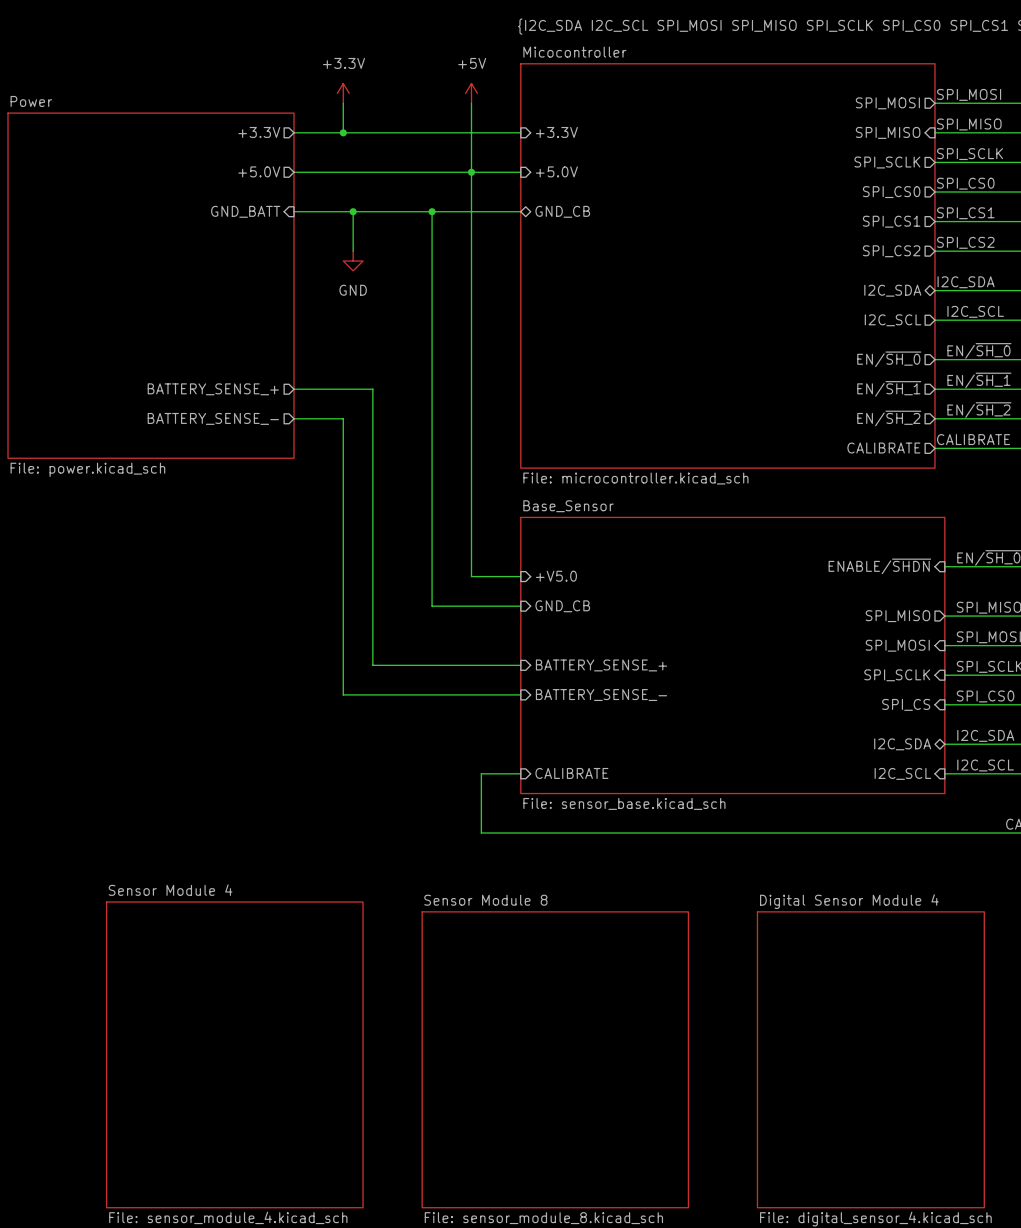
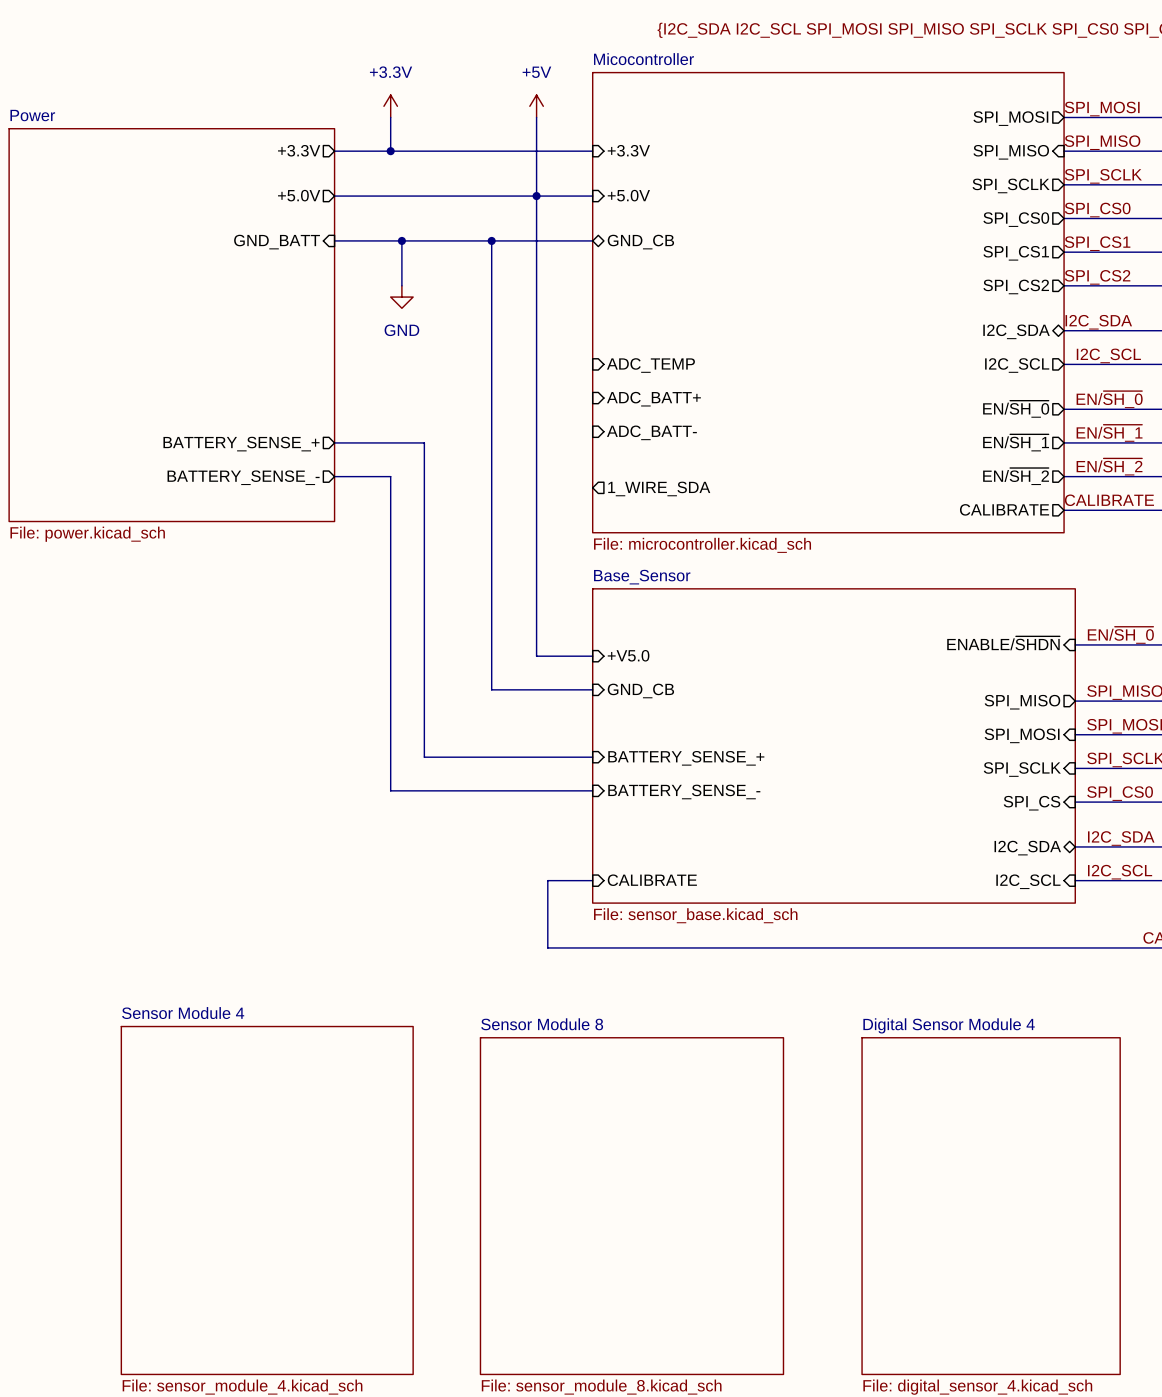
sheet pin: none -> ADC_TEMP (650, 365)
sheet pin: none -> ADC_BATT+ (653, 399)
sheet pin: none -> ADC_BATT- (651, 432)
sheet pin: none -> 1_WIRE_SDA (659, 488)

